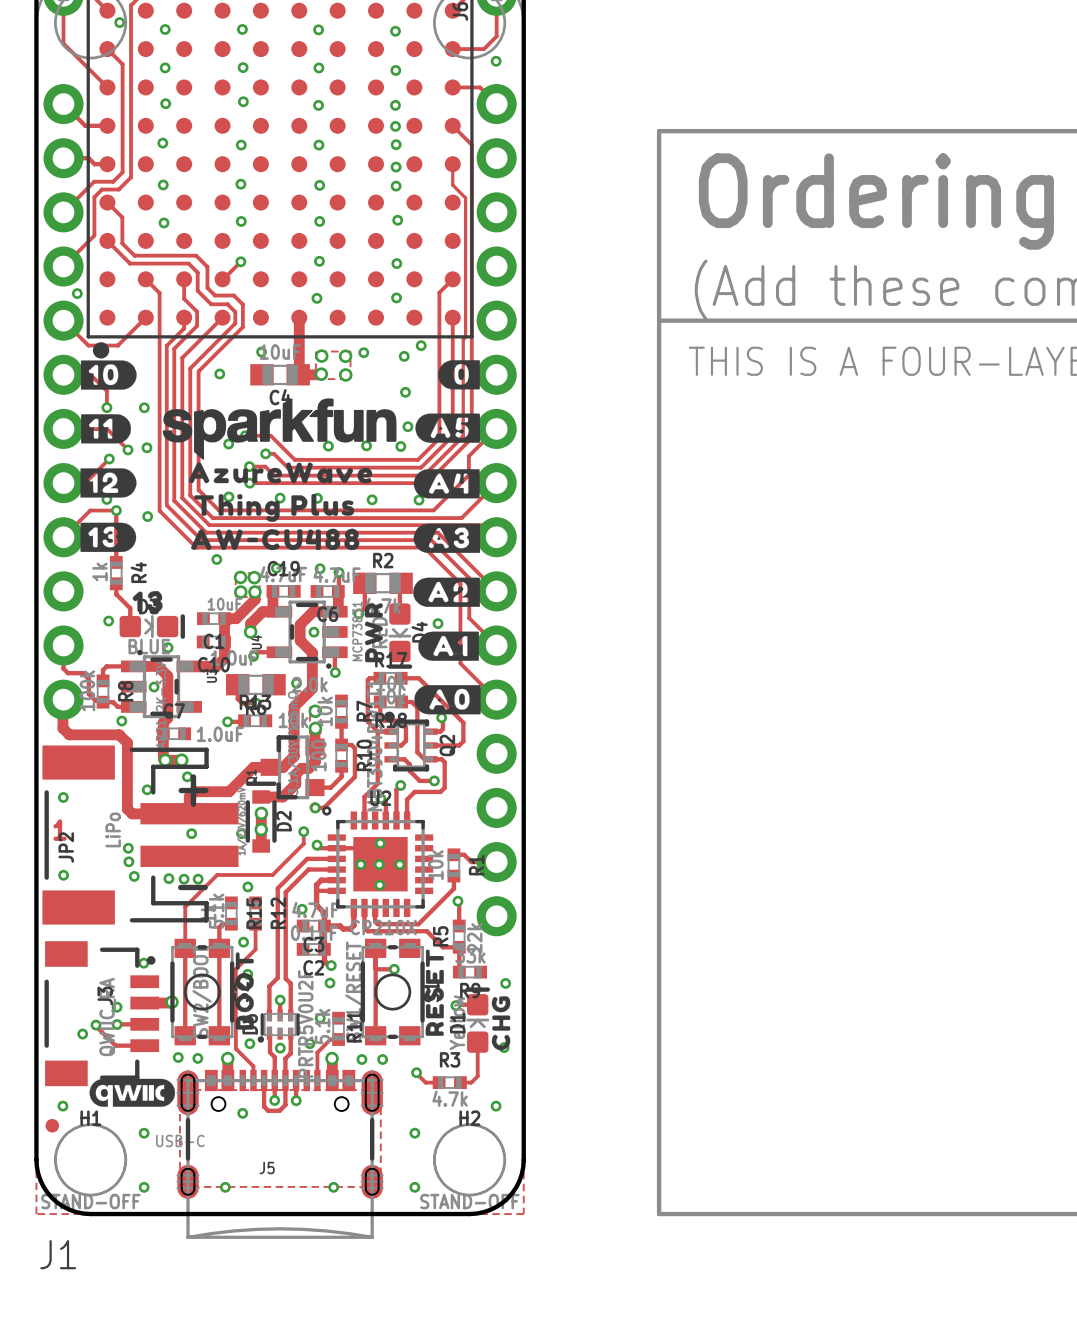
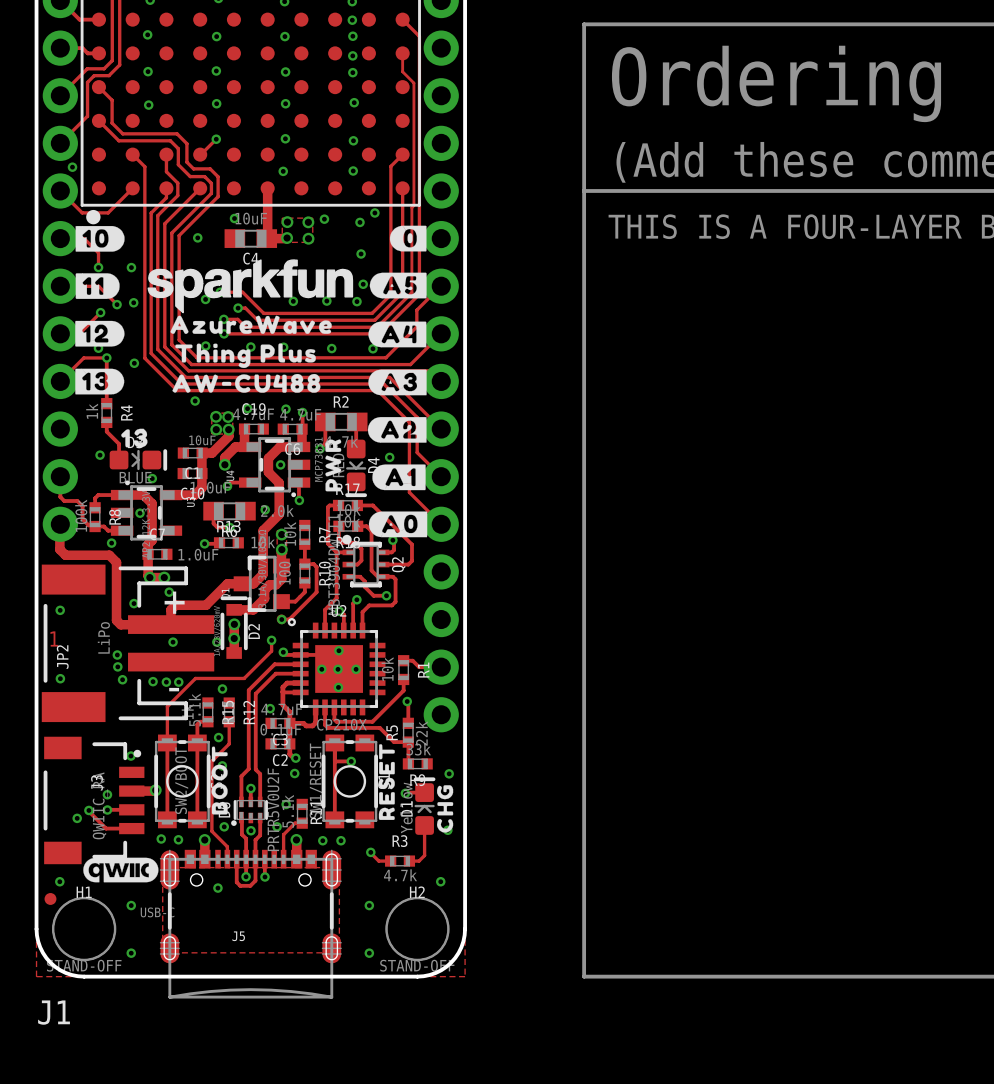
via: (225, 1187) -> none
via: (333, 1187) -> none

